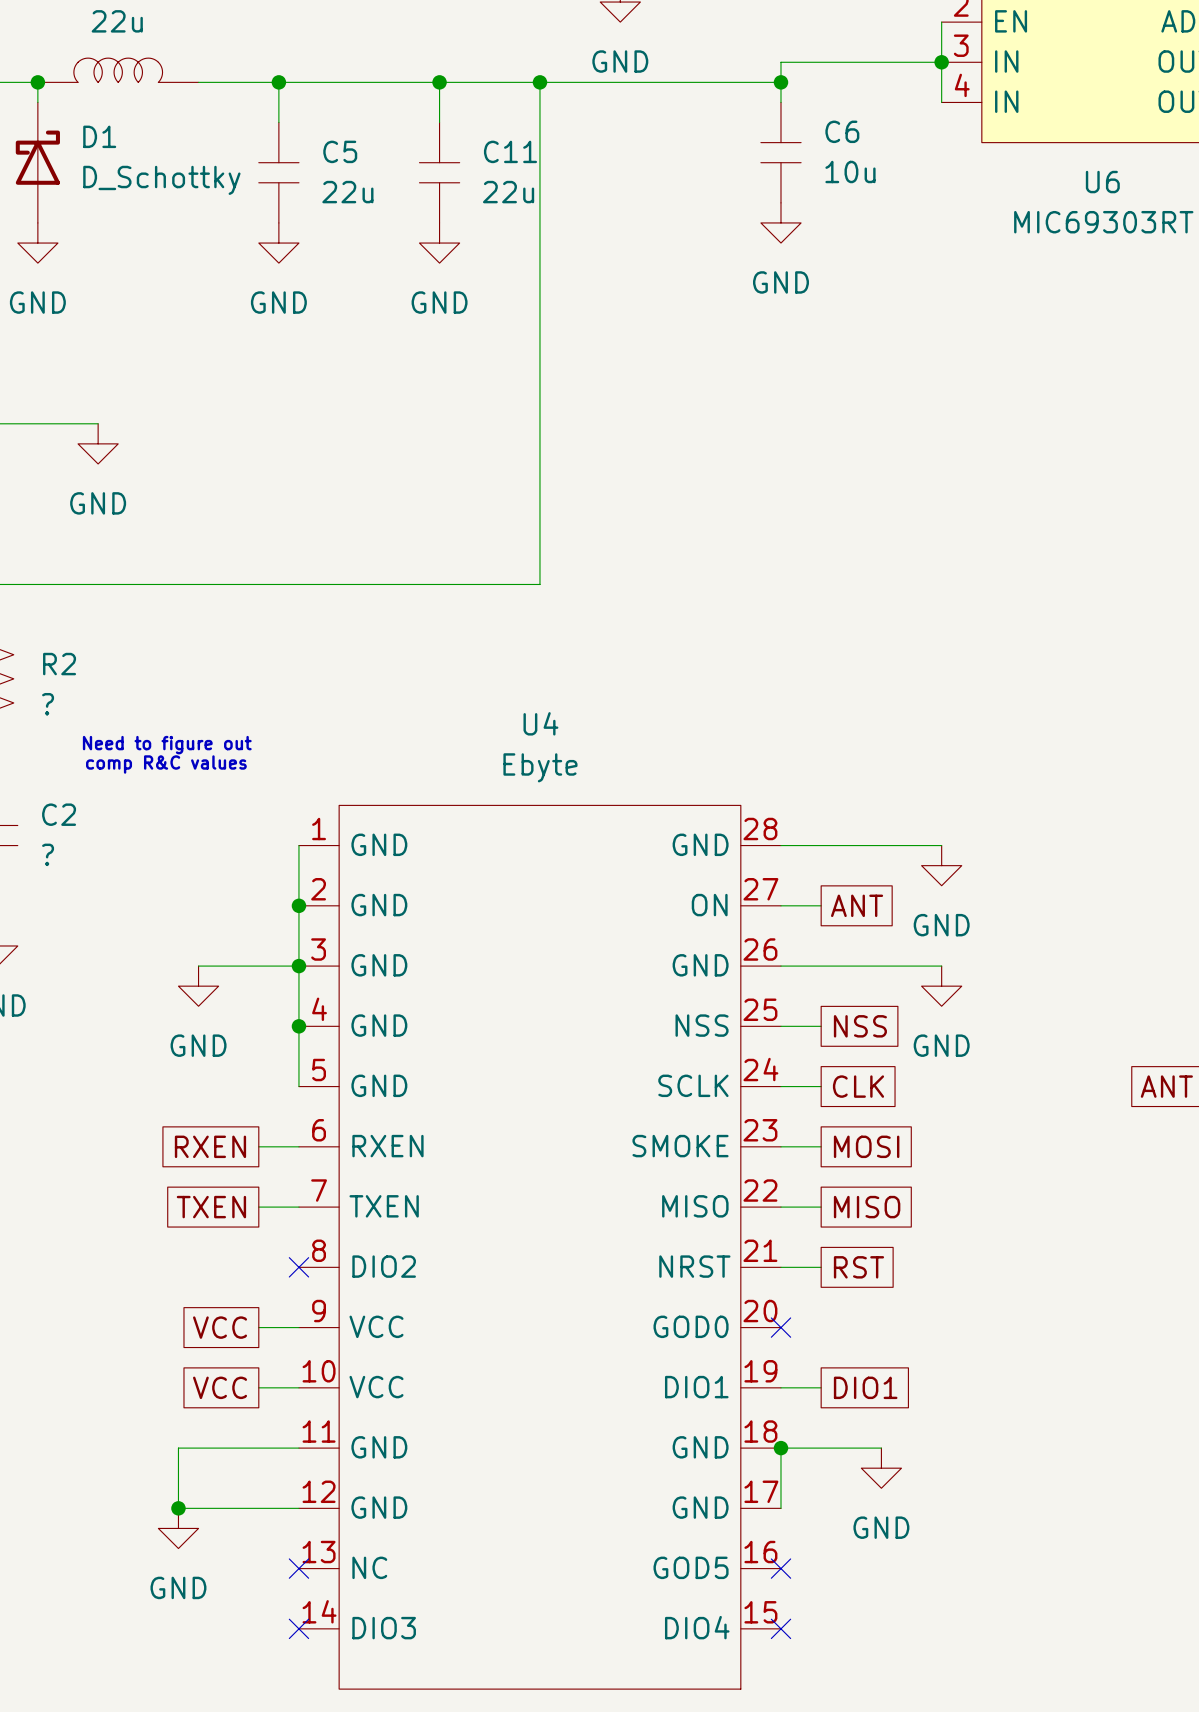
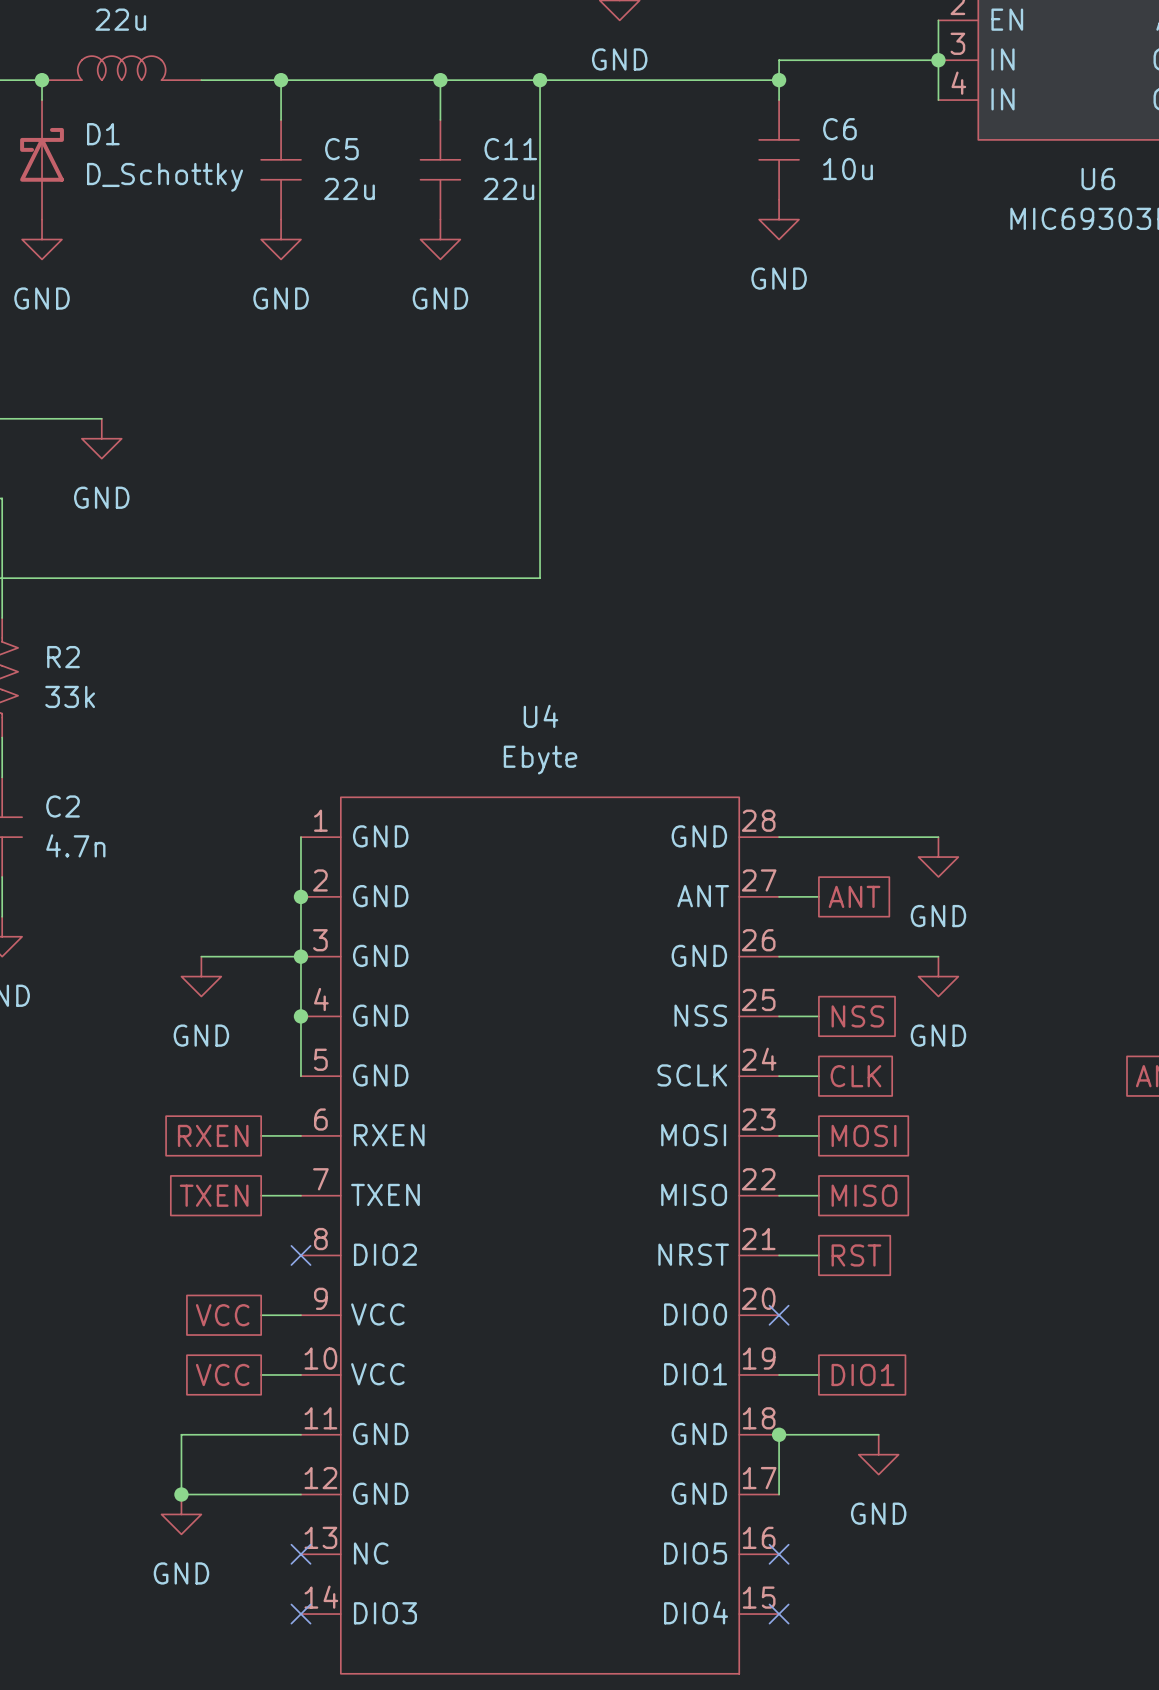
R2 value: ? (48, 704) -> 33k (70, 696)
text: Need to figure out (167, 745) -> none
text: comp R&C values (166, 764) -> none
C2 value: ? (48, 854) -> 4.7n (75, 845)
U4 pin name: ON (709, 905) -> ANT (703, 896)
U4 pin name: SMOKE (680, 1146) -> MOSI (693, 1135)
U4 pin name: GOD0 (691, 1326) -> DIO0 (695, 1314)
U4 pin name: GOD5 (691, 1567) -> DIO5 (695, 1553)

